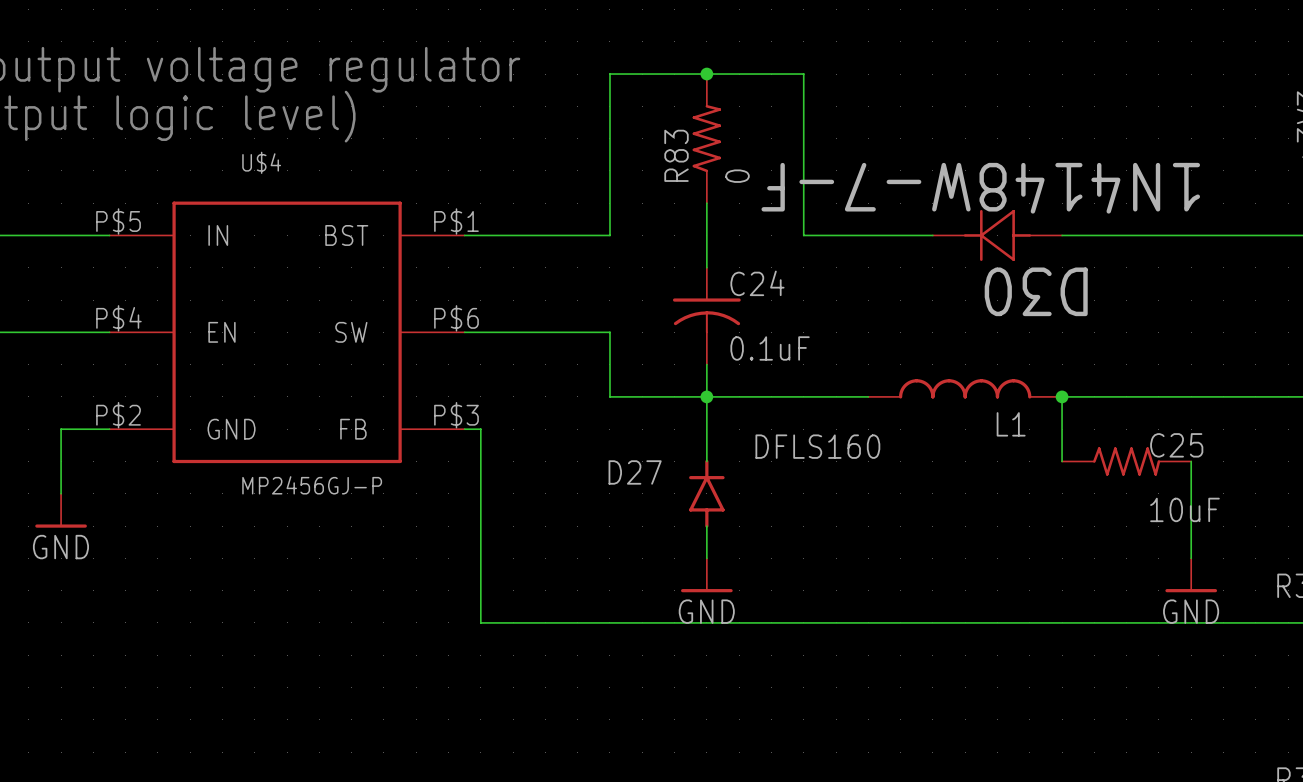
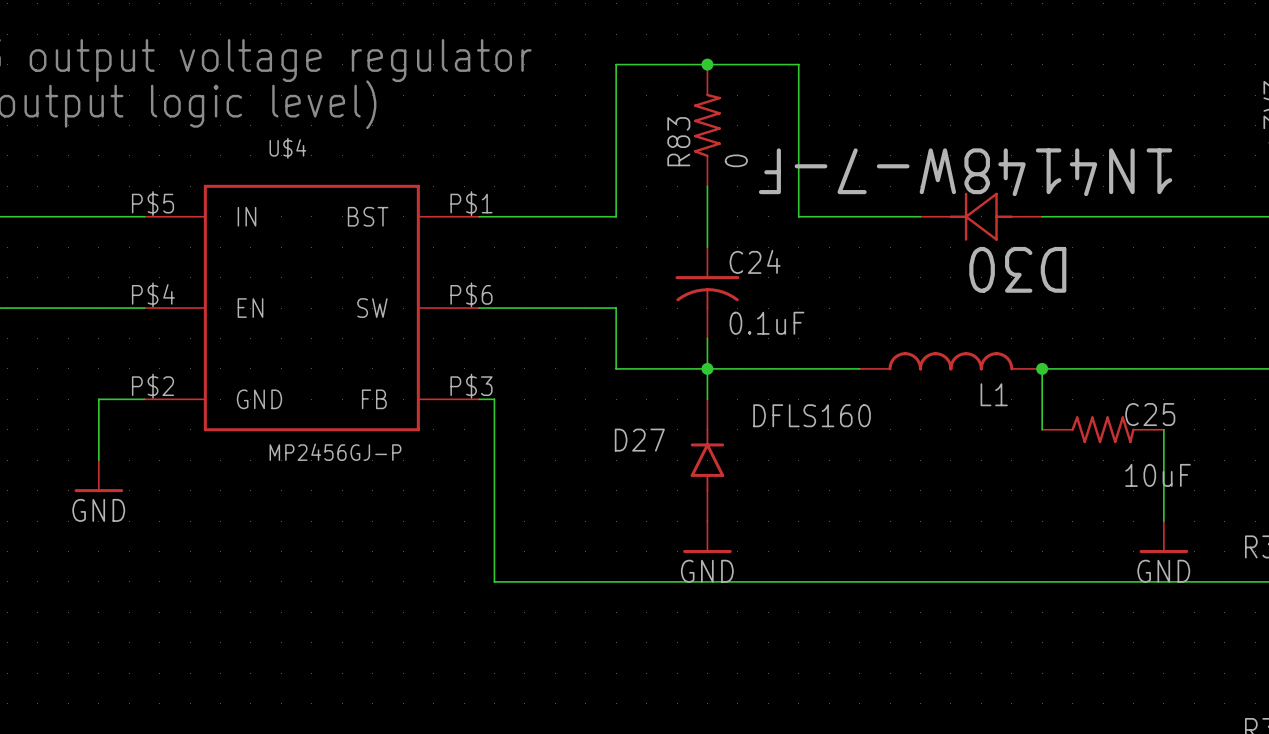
D27 symbol: [689, 459, 725, 528] -> [690, 399, 725, 522]

